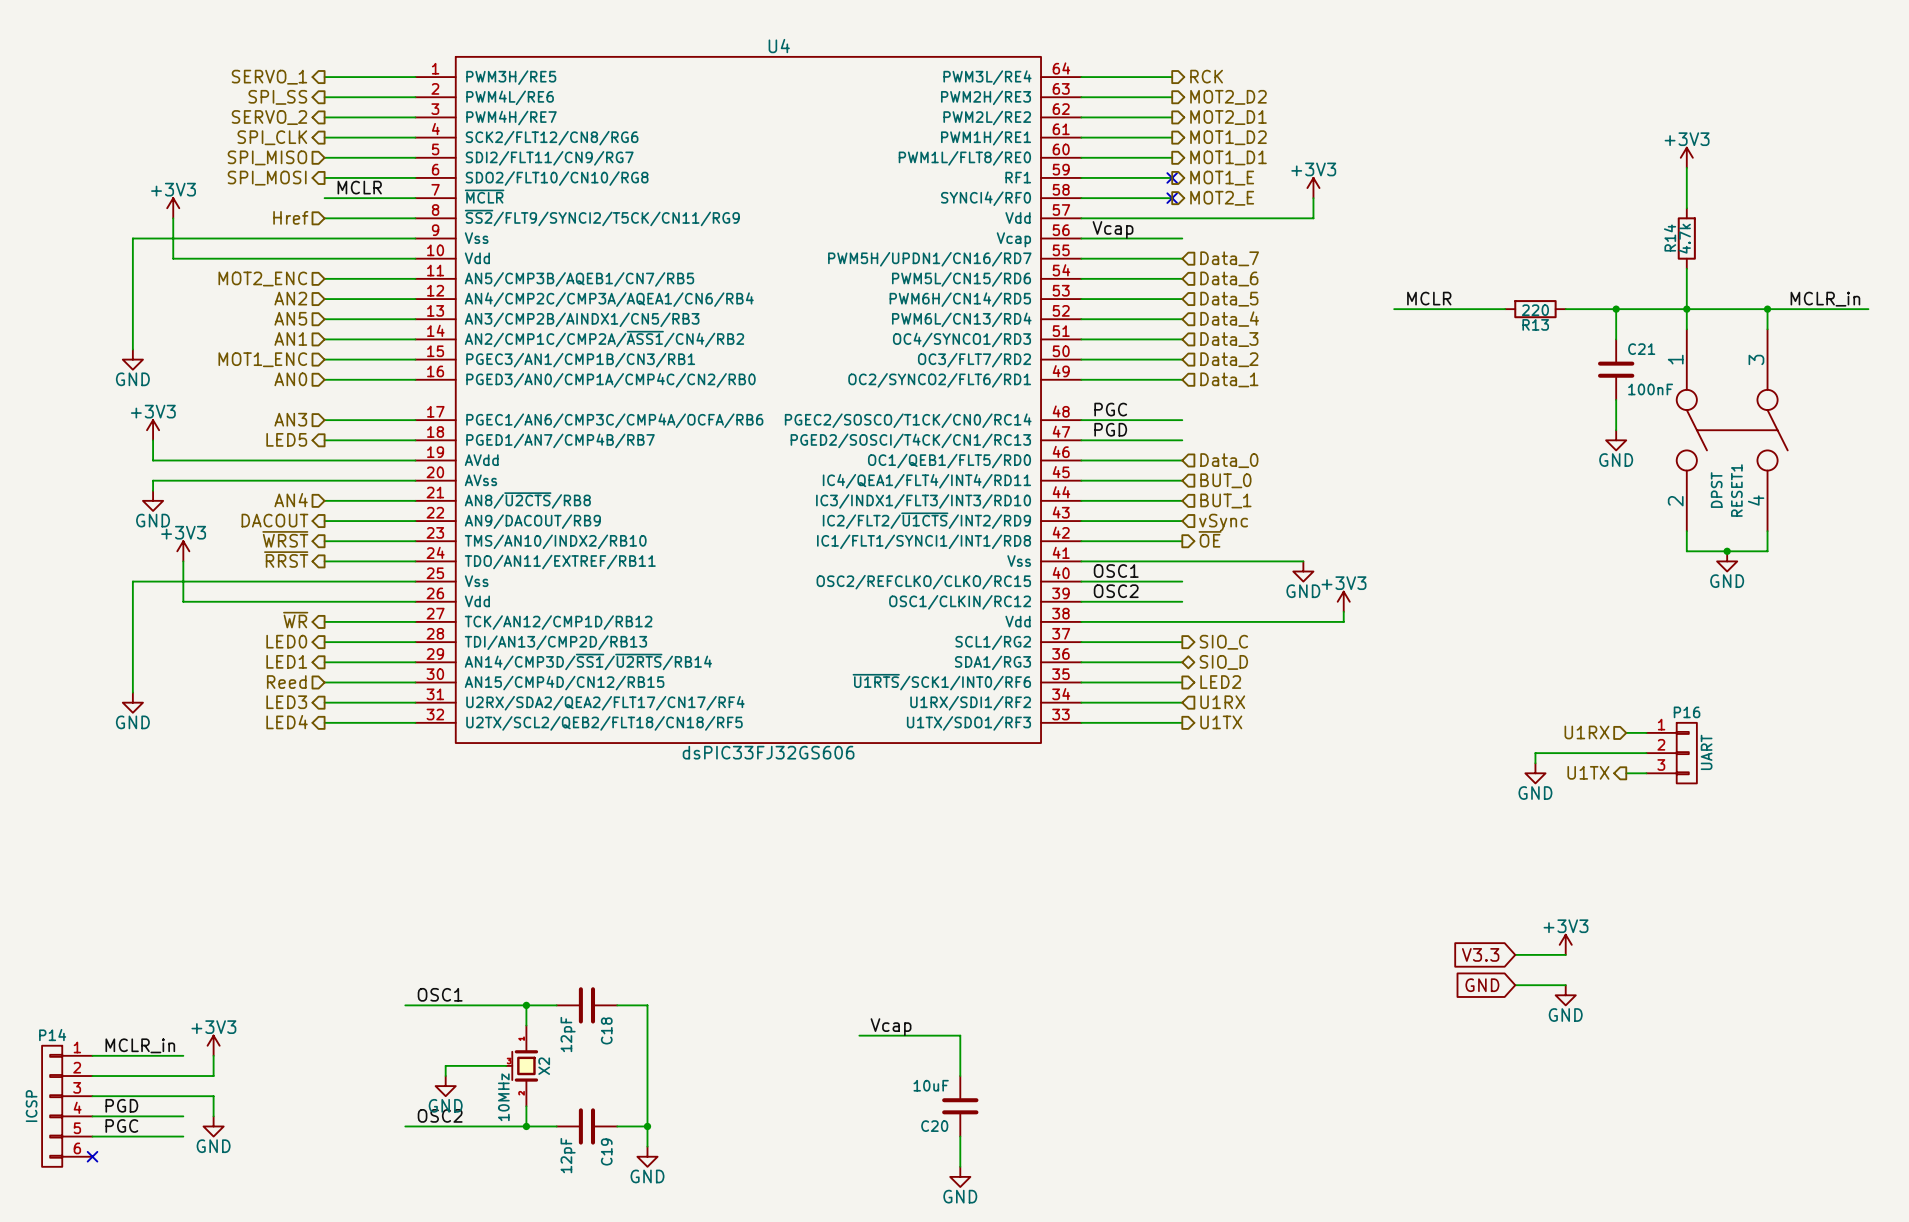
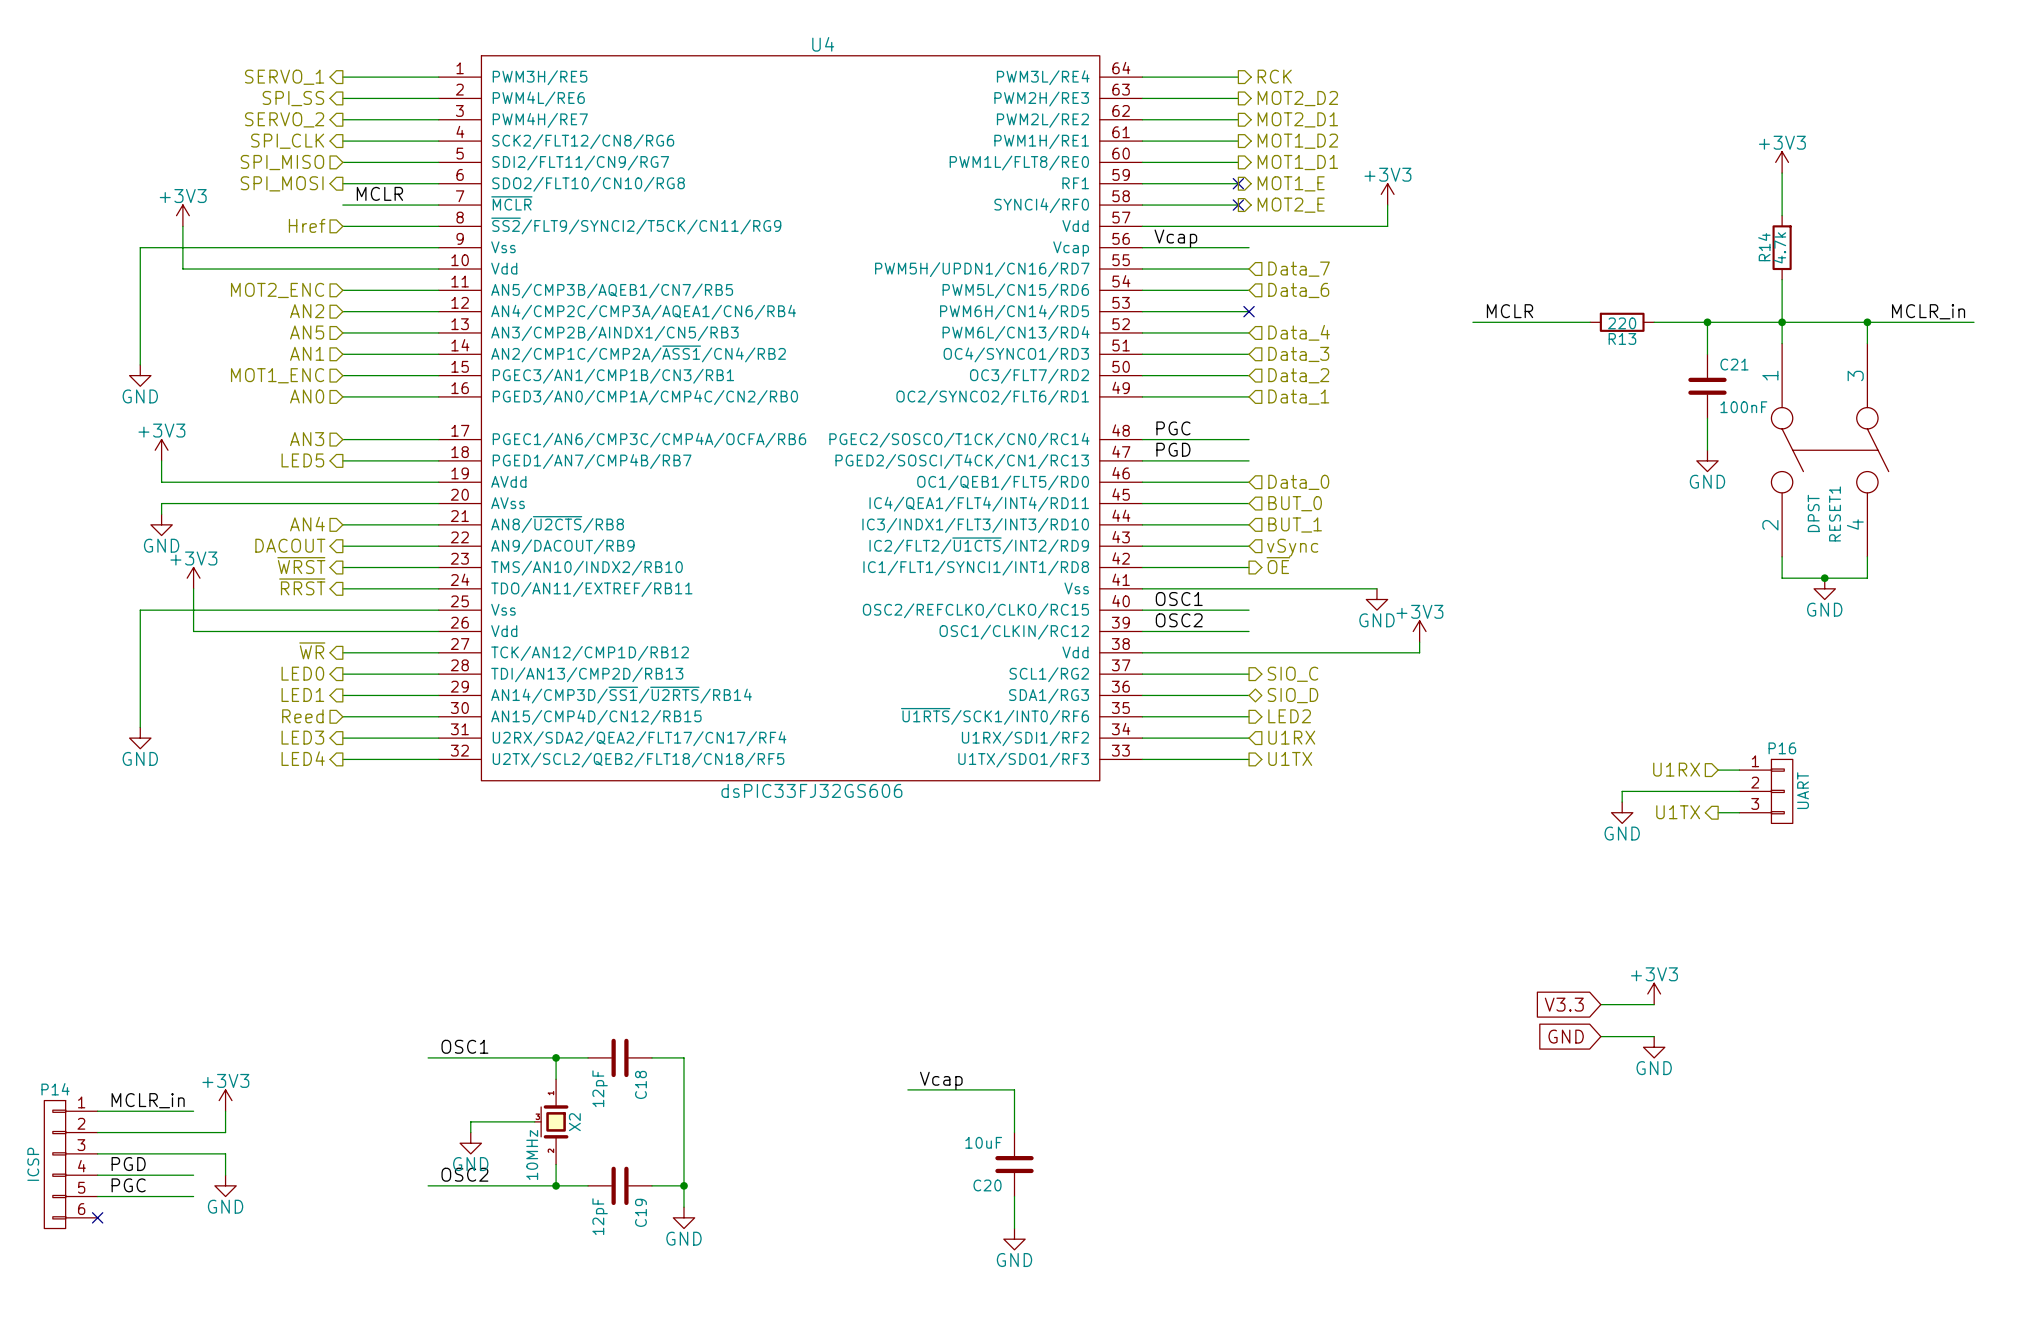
no-connect mark: none -> (1249, 311)
hierarchical label: Data_5 (1229, 299) -> none

